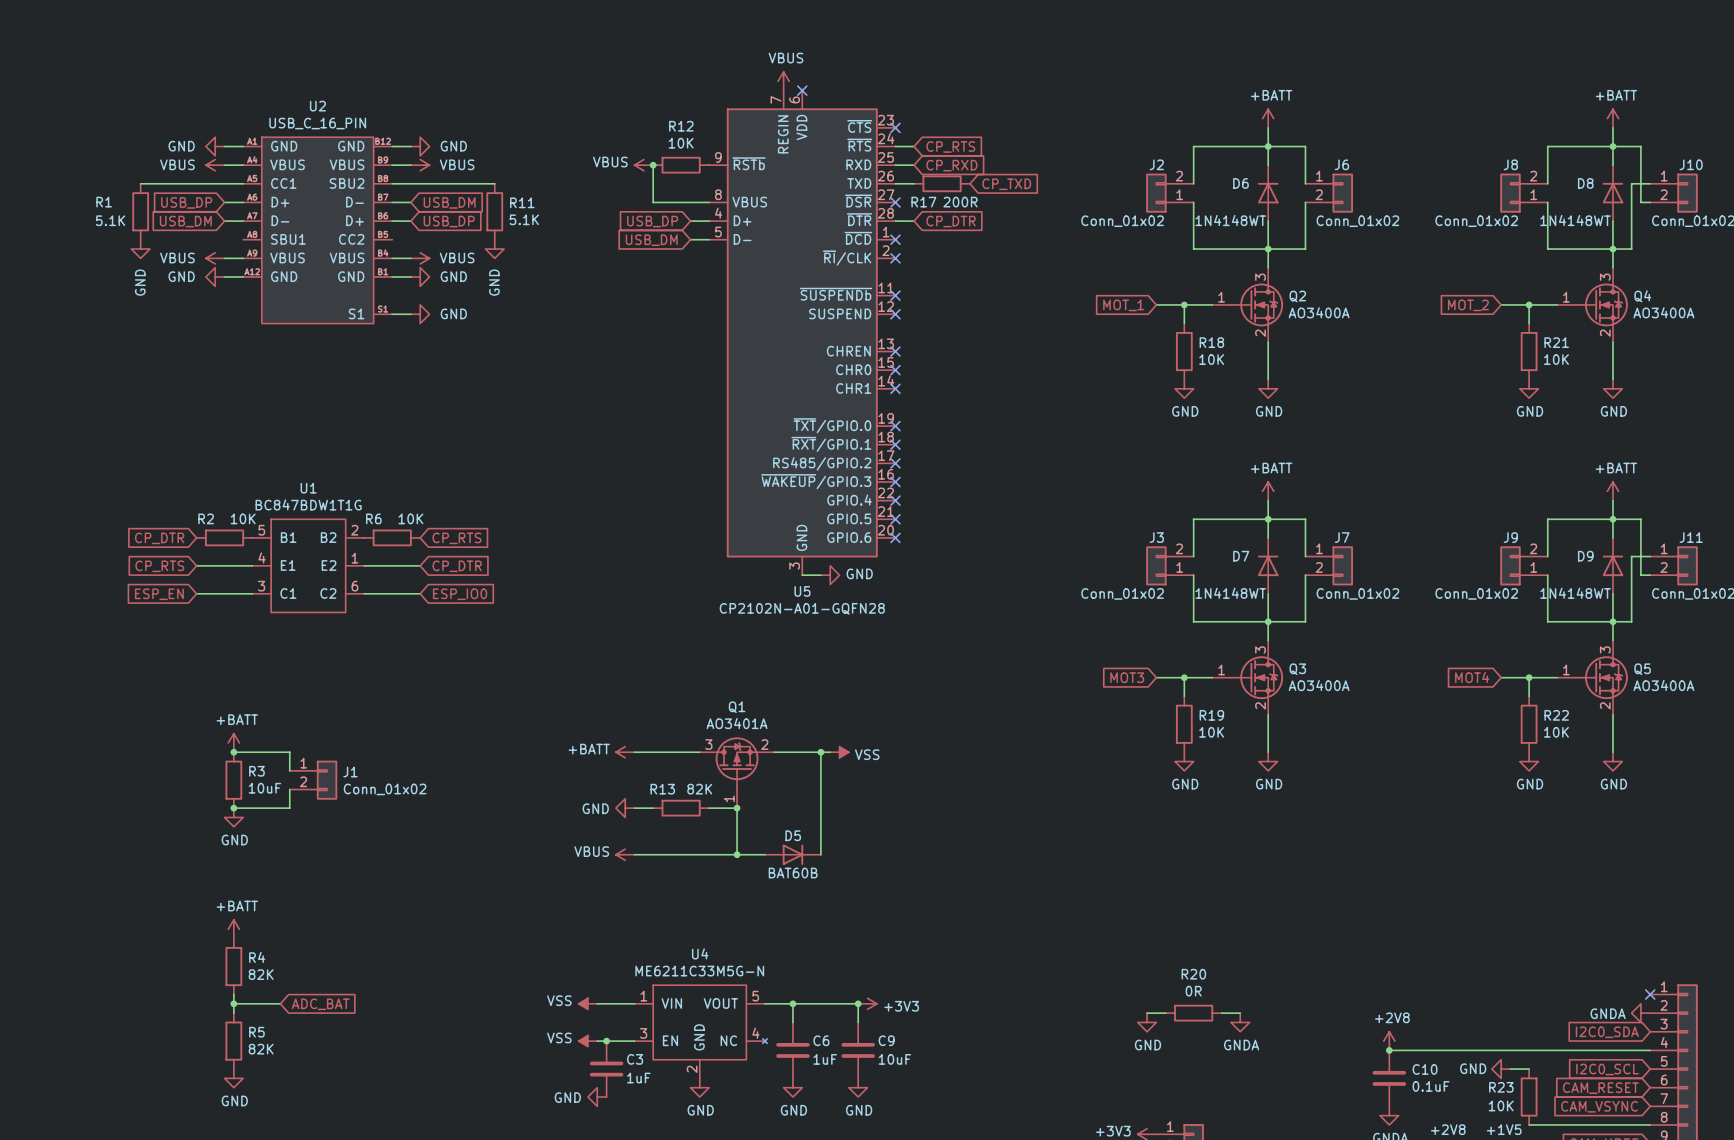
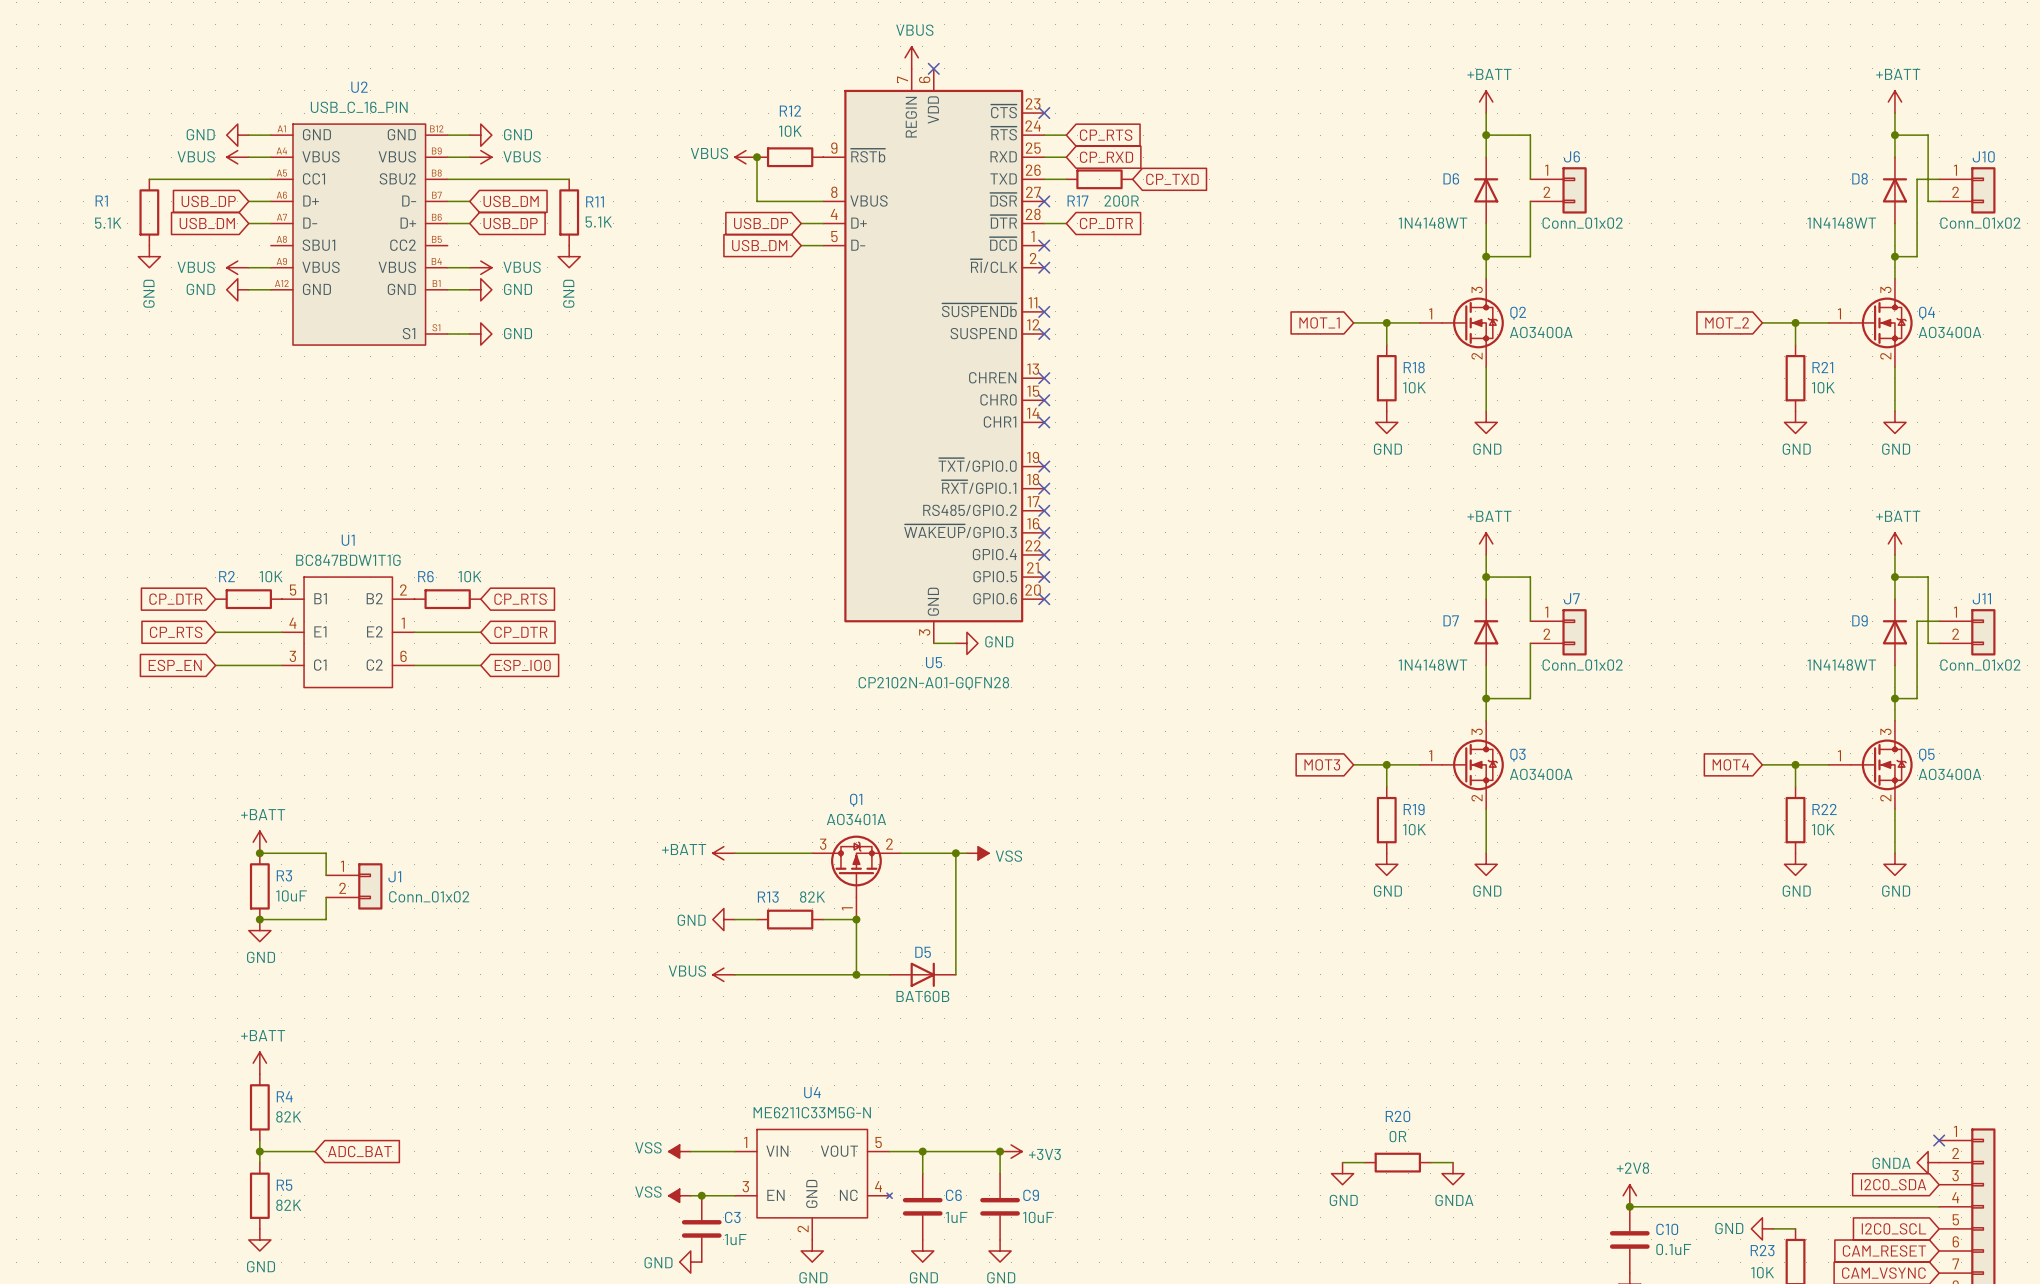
wire: (1268, 146) (1193, 146) (1193, 183) -> none
wire: (1612, 146) (1547, 146) (1547, 183) -> none
J2: Conn_01x02 (1169, 193) -> none
J8: Conn_01x02 (1523, 193) -> none
wire: (1193, 202) (1193, 249) (1268, 249) -> none
wire: (1547, 202) (1547, 249) (1612, 249) -> none
wire: (1268, 519) (1193, 519) (1193, 556) -> none
wire: (1612, 519) (1547, 519) (1547, 556) -> none
J3: Conn_01x02 (1169, 565) -> none
J9: Conn_01x02 (1523, 565) -> none
wire: (1193, 575) (1193, 621) (1268, 621) -> none
wire: (1547, 575) (1547, 621) (1612, 621) -> none

